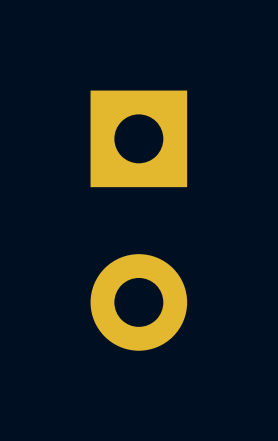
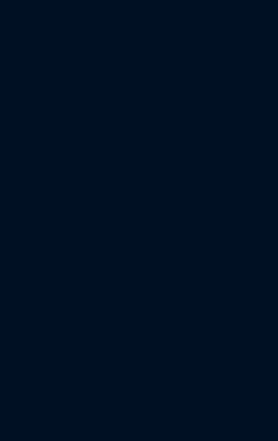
part: (138, 220) -> none

